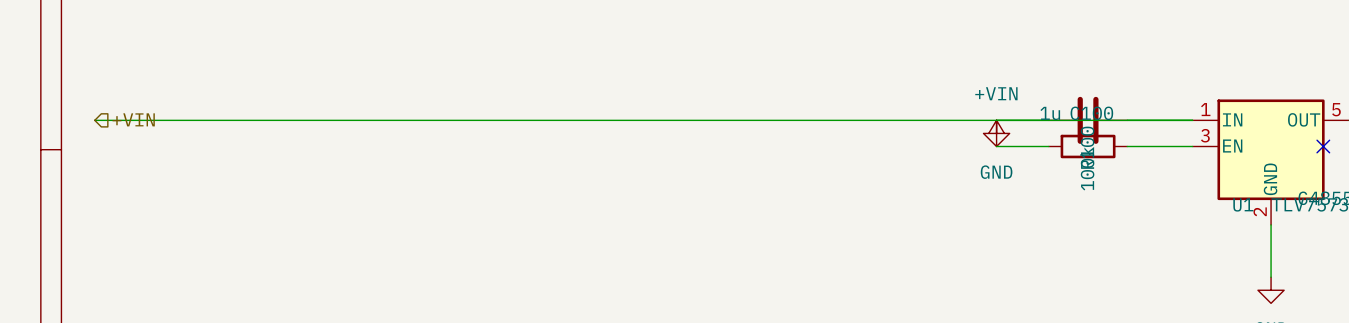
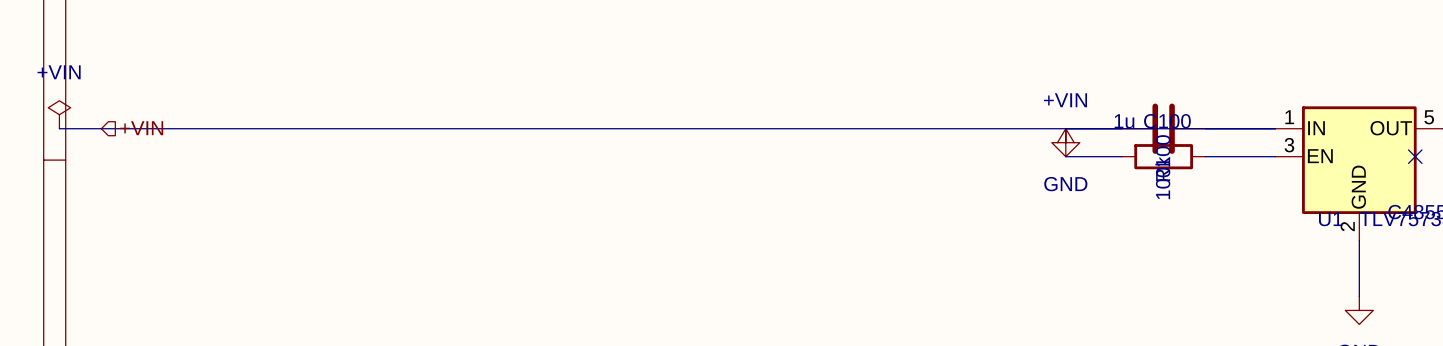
power symbol: none -> +VIN (59, 114)
wire: none -> (59, 128) (101, 128)

